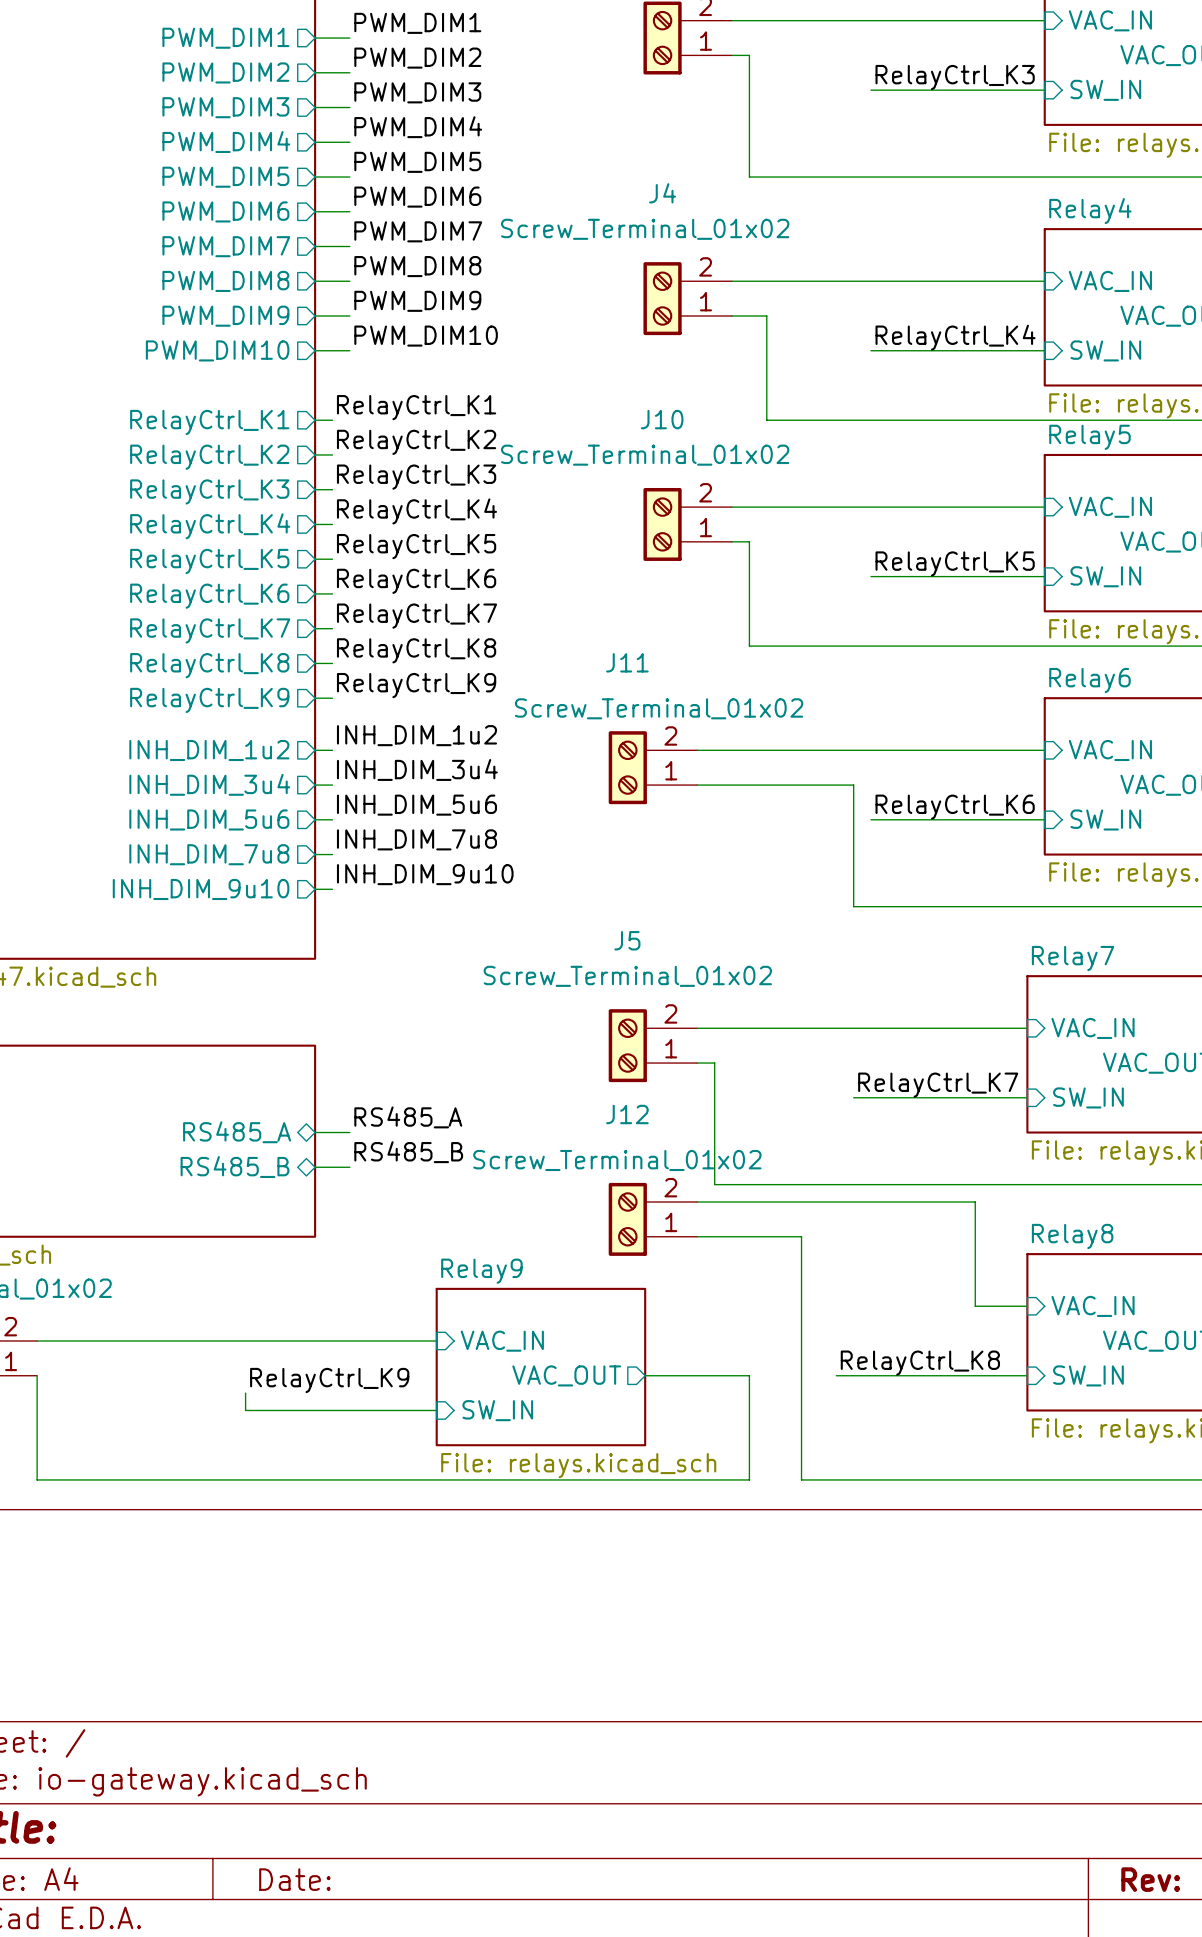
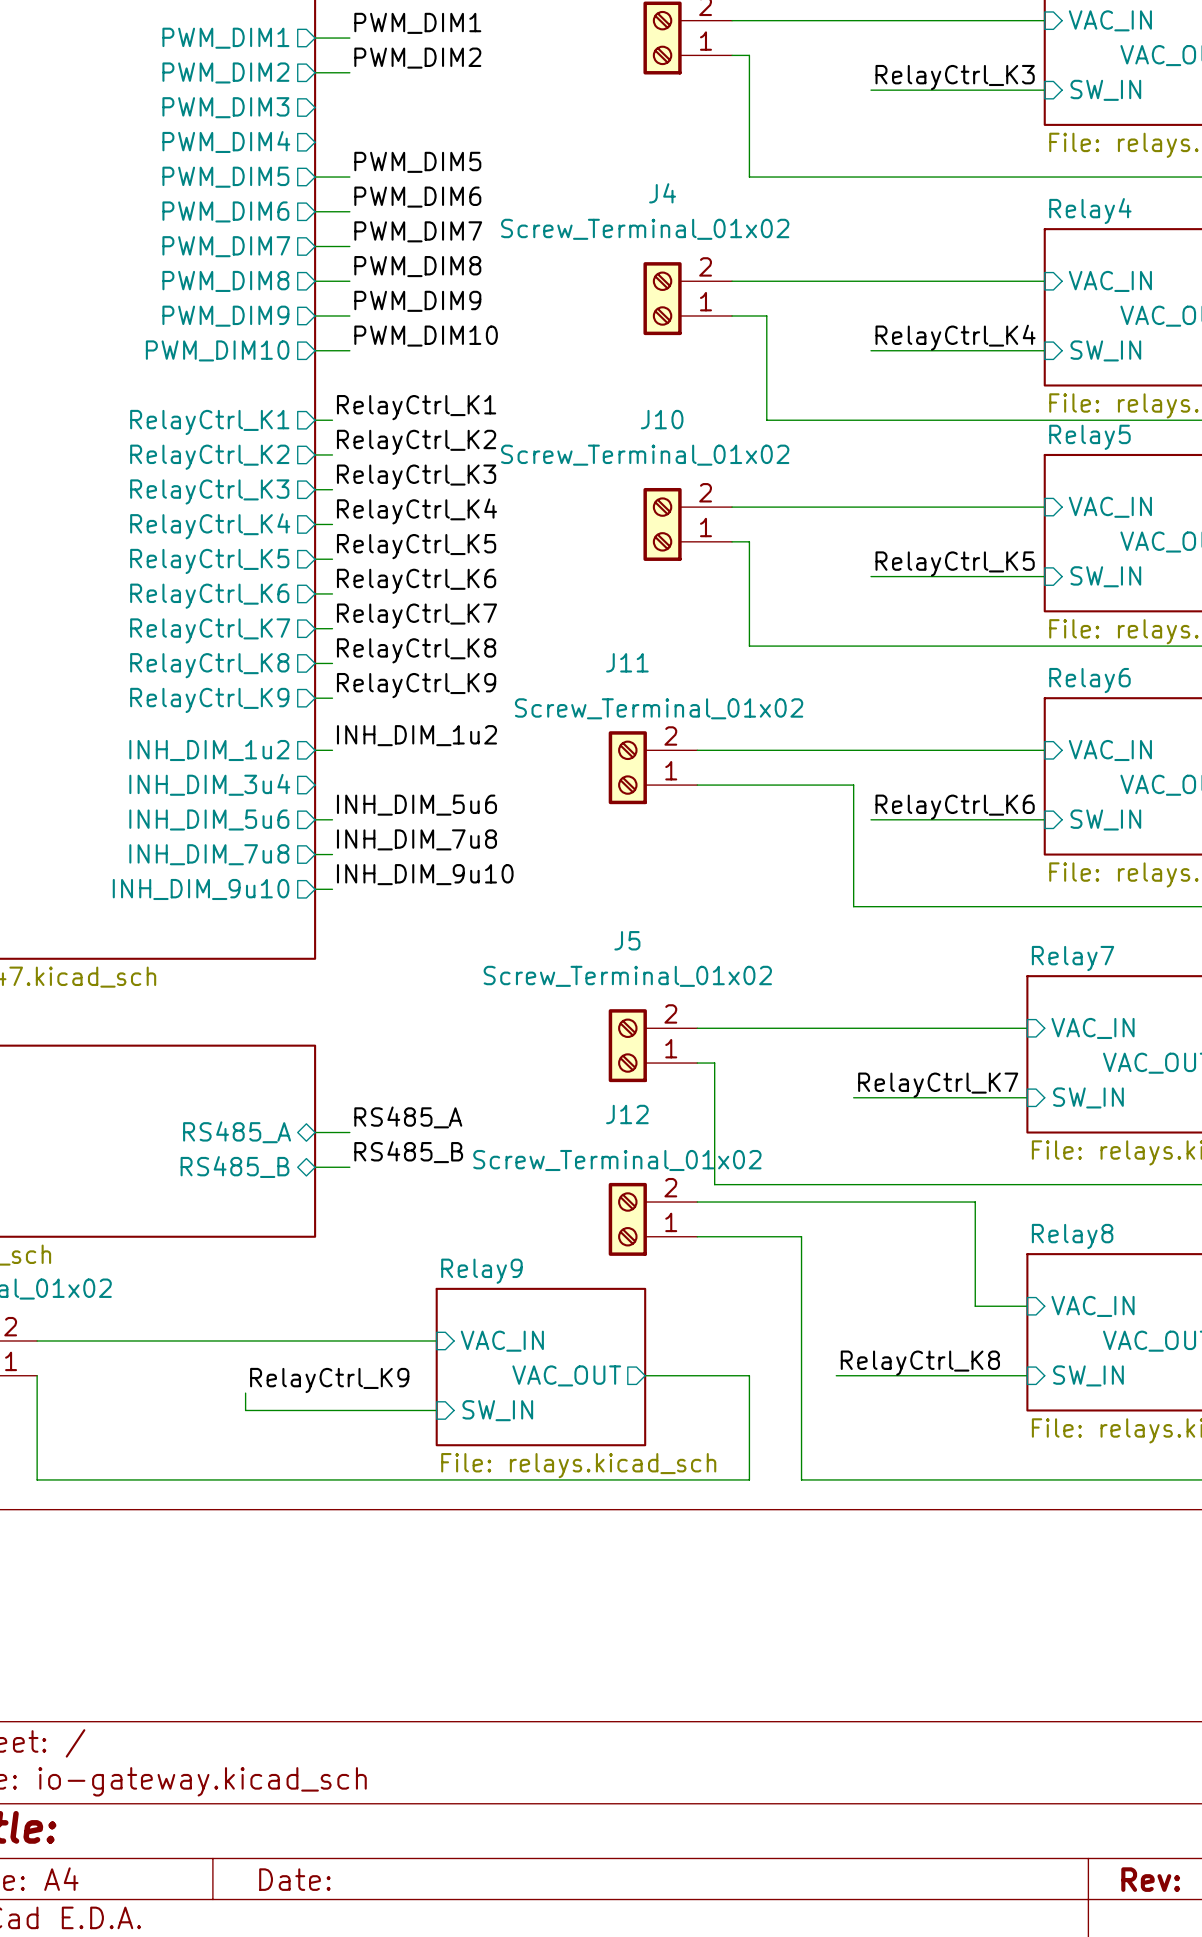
label: PWM_DIM3 (417, 92) -> none
wire: (315, 107) (349, 107) -> none
label: PWM_DIM4 (418, 127) -> none
wire: (315, 142) (349, 142) -> none
label: INH_DIM_3u4 (417, 769) -> none
wire: (315, 785) (332, 785) -> none

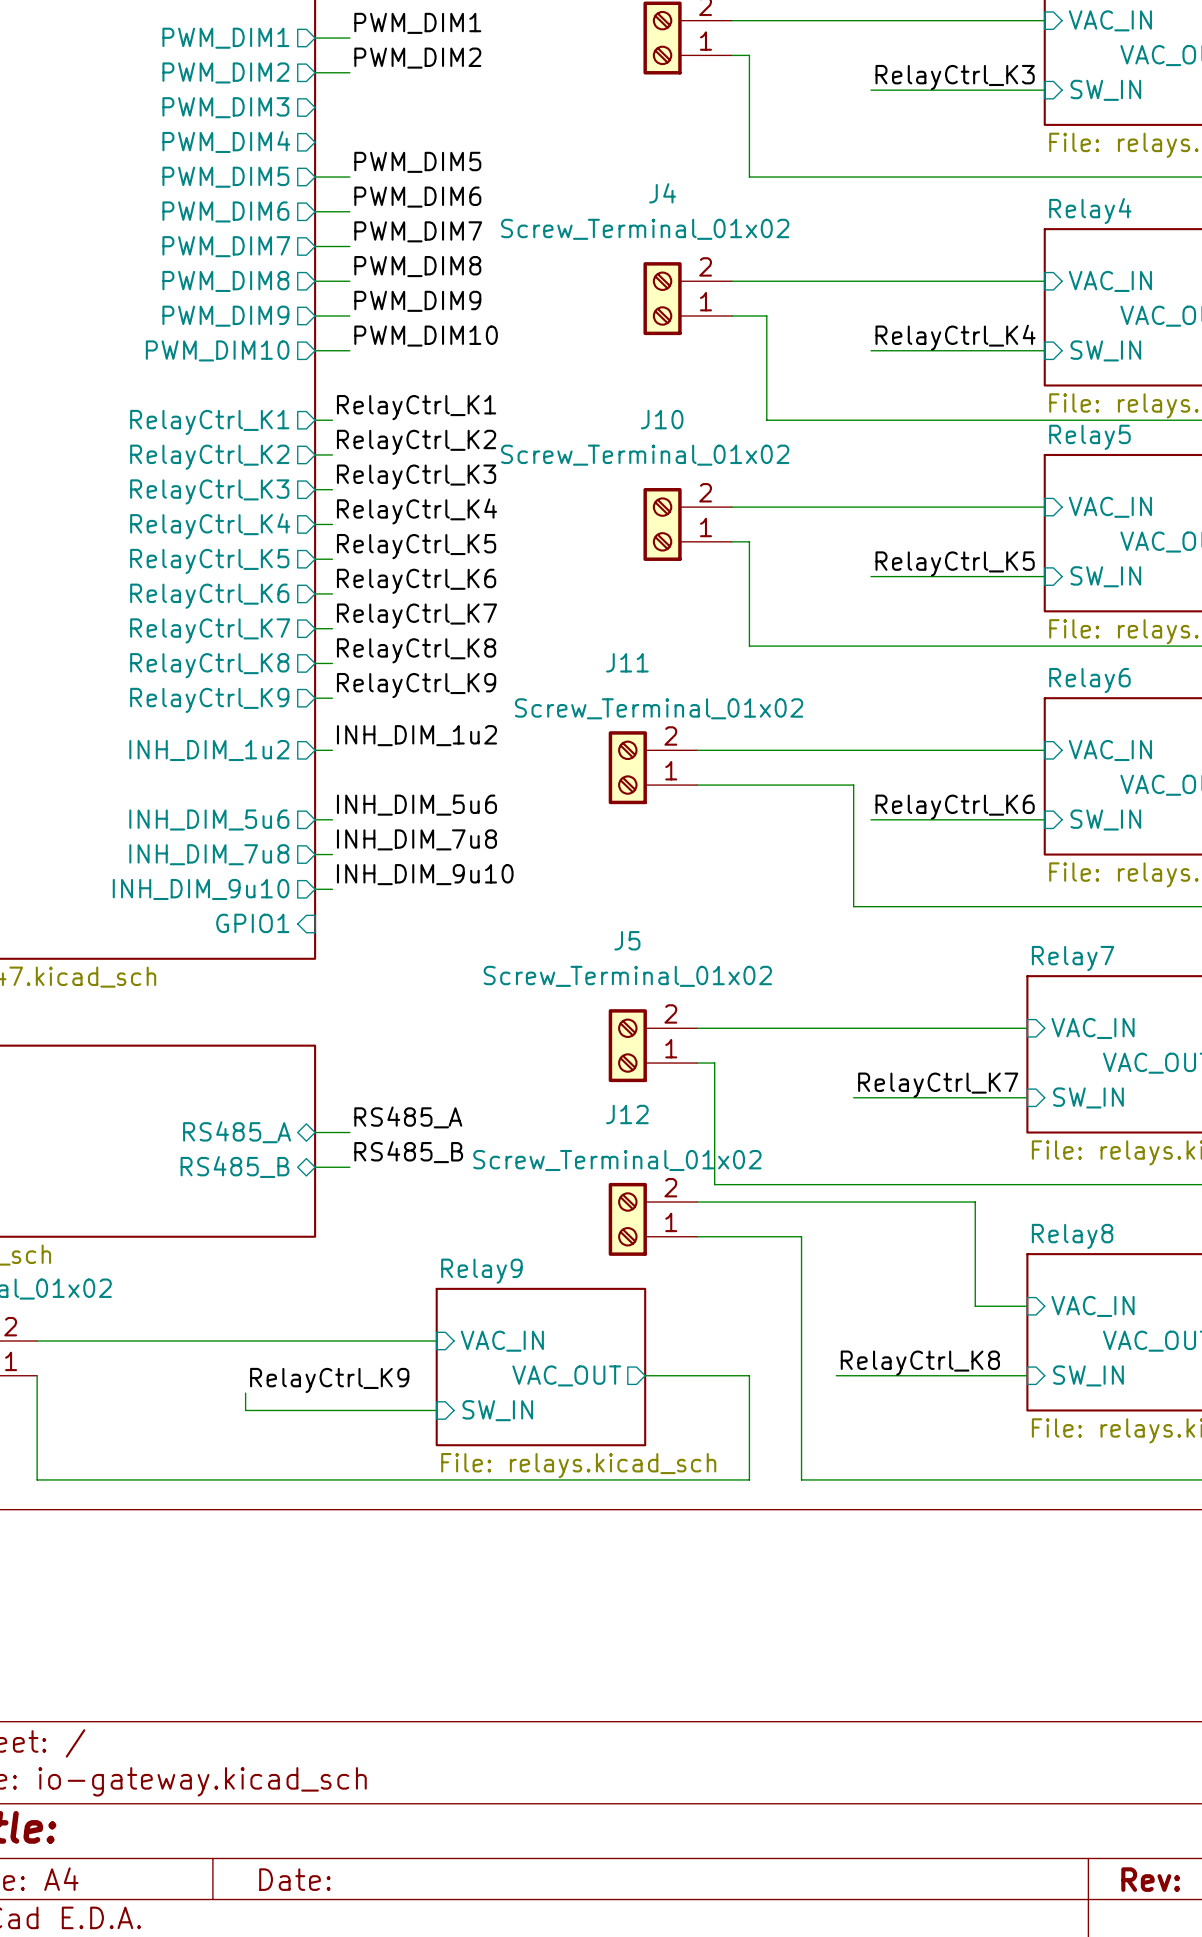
sheet pin: INH_DIM_3u4 (209, 784) -> none
sheet pin: none -> GPIO1 (252, 923)

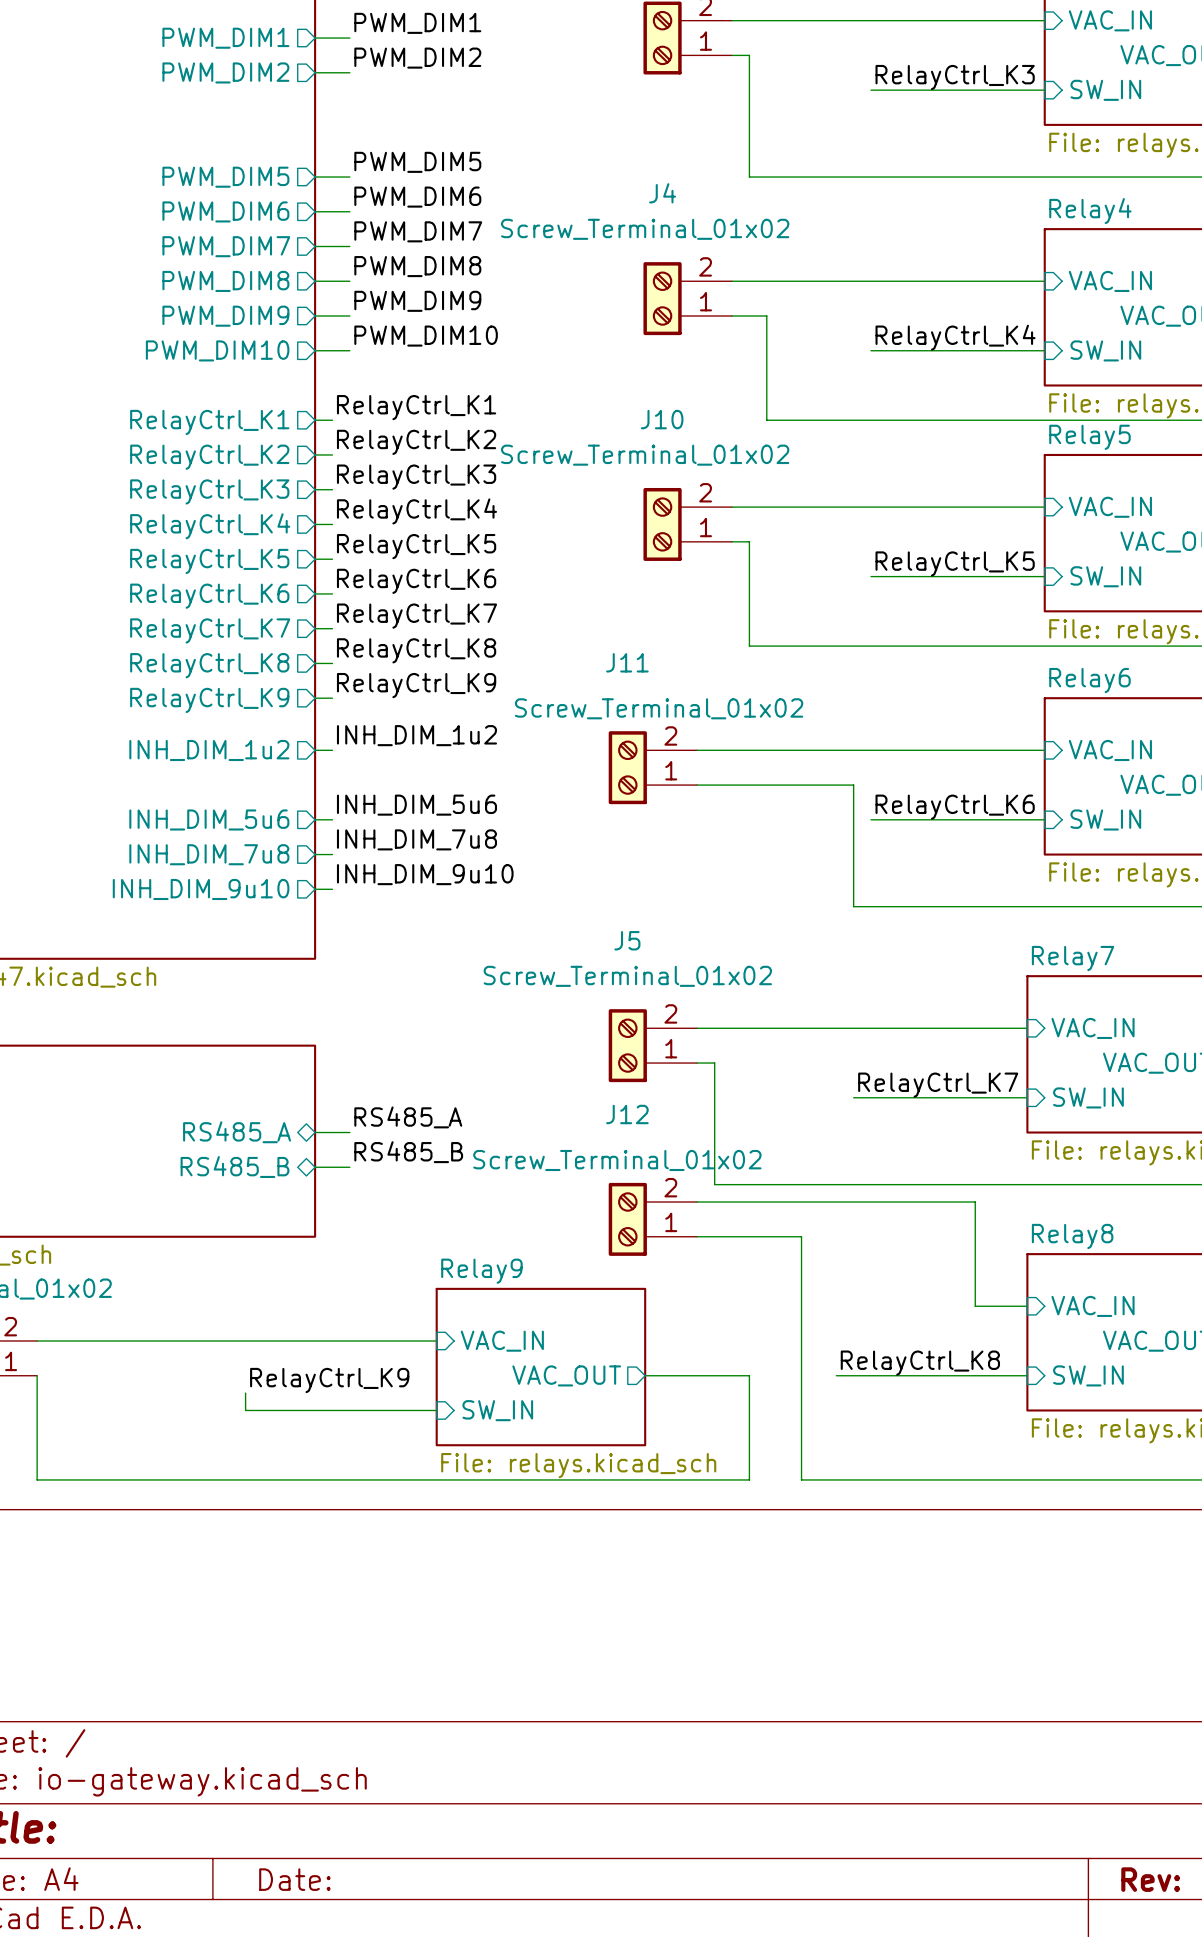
sheet pin: PWM_DIM3 (225, 107) -> none
sheet pin: PWM_DIM4 (226, 142) -> none
sheet pin: GPIO1 (252, 923) -> none

